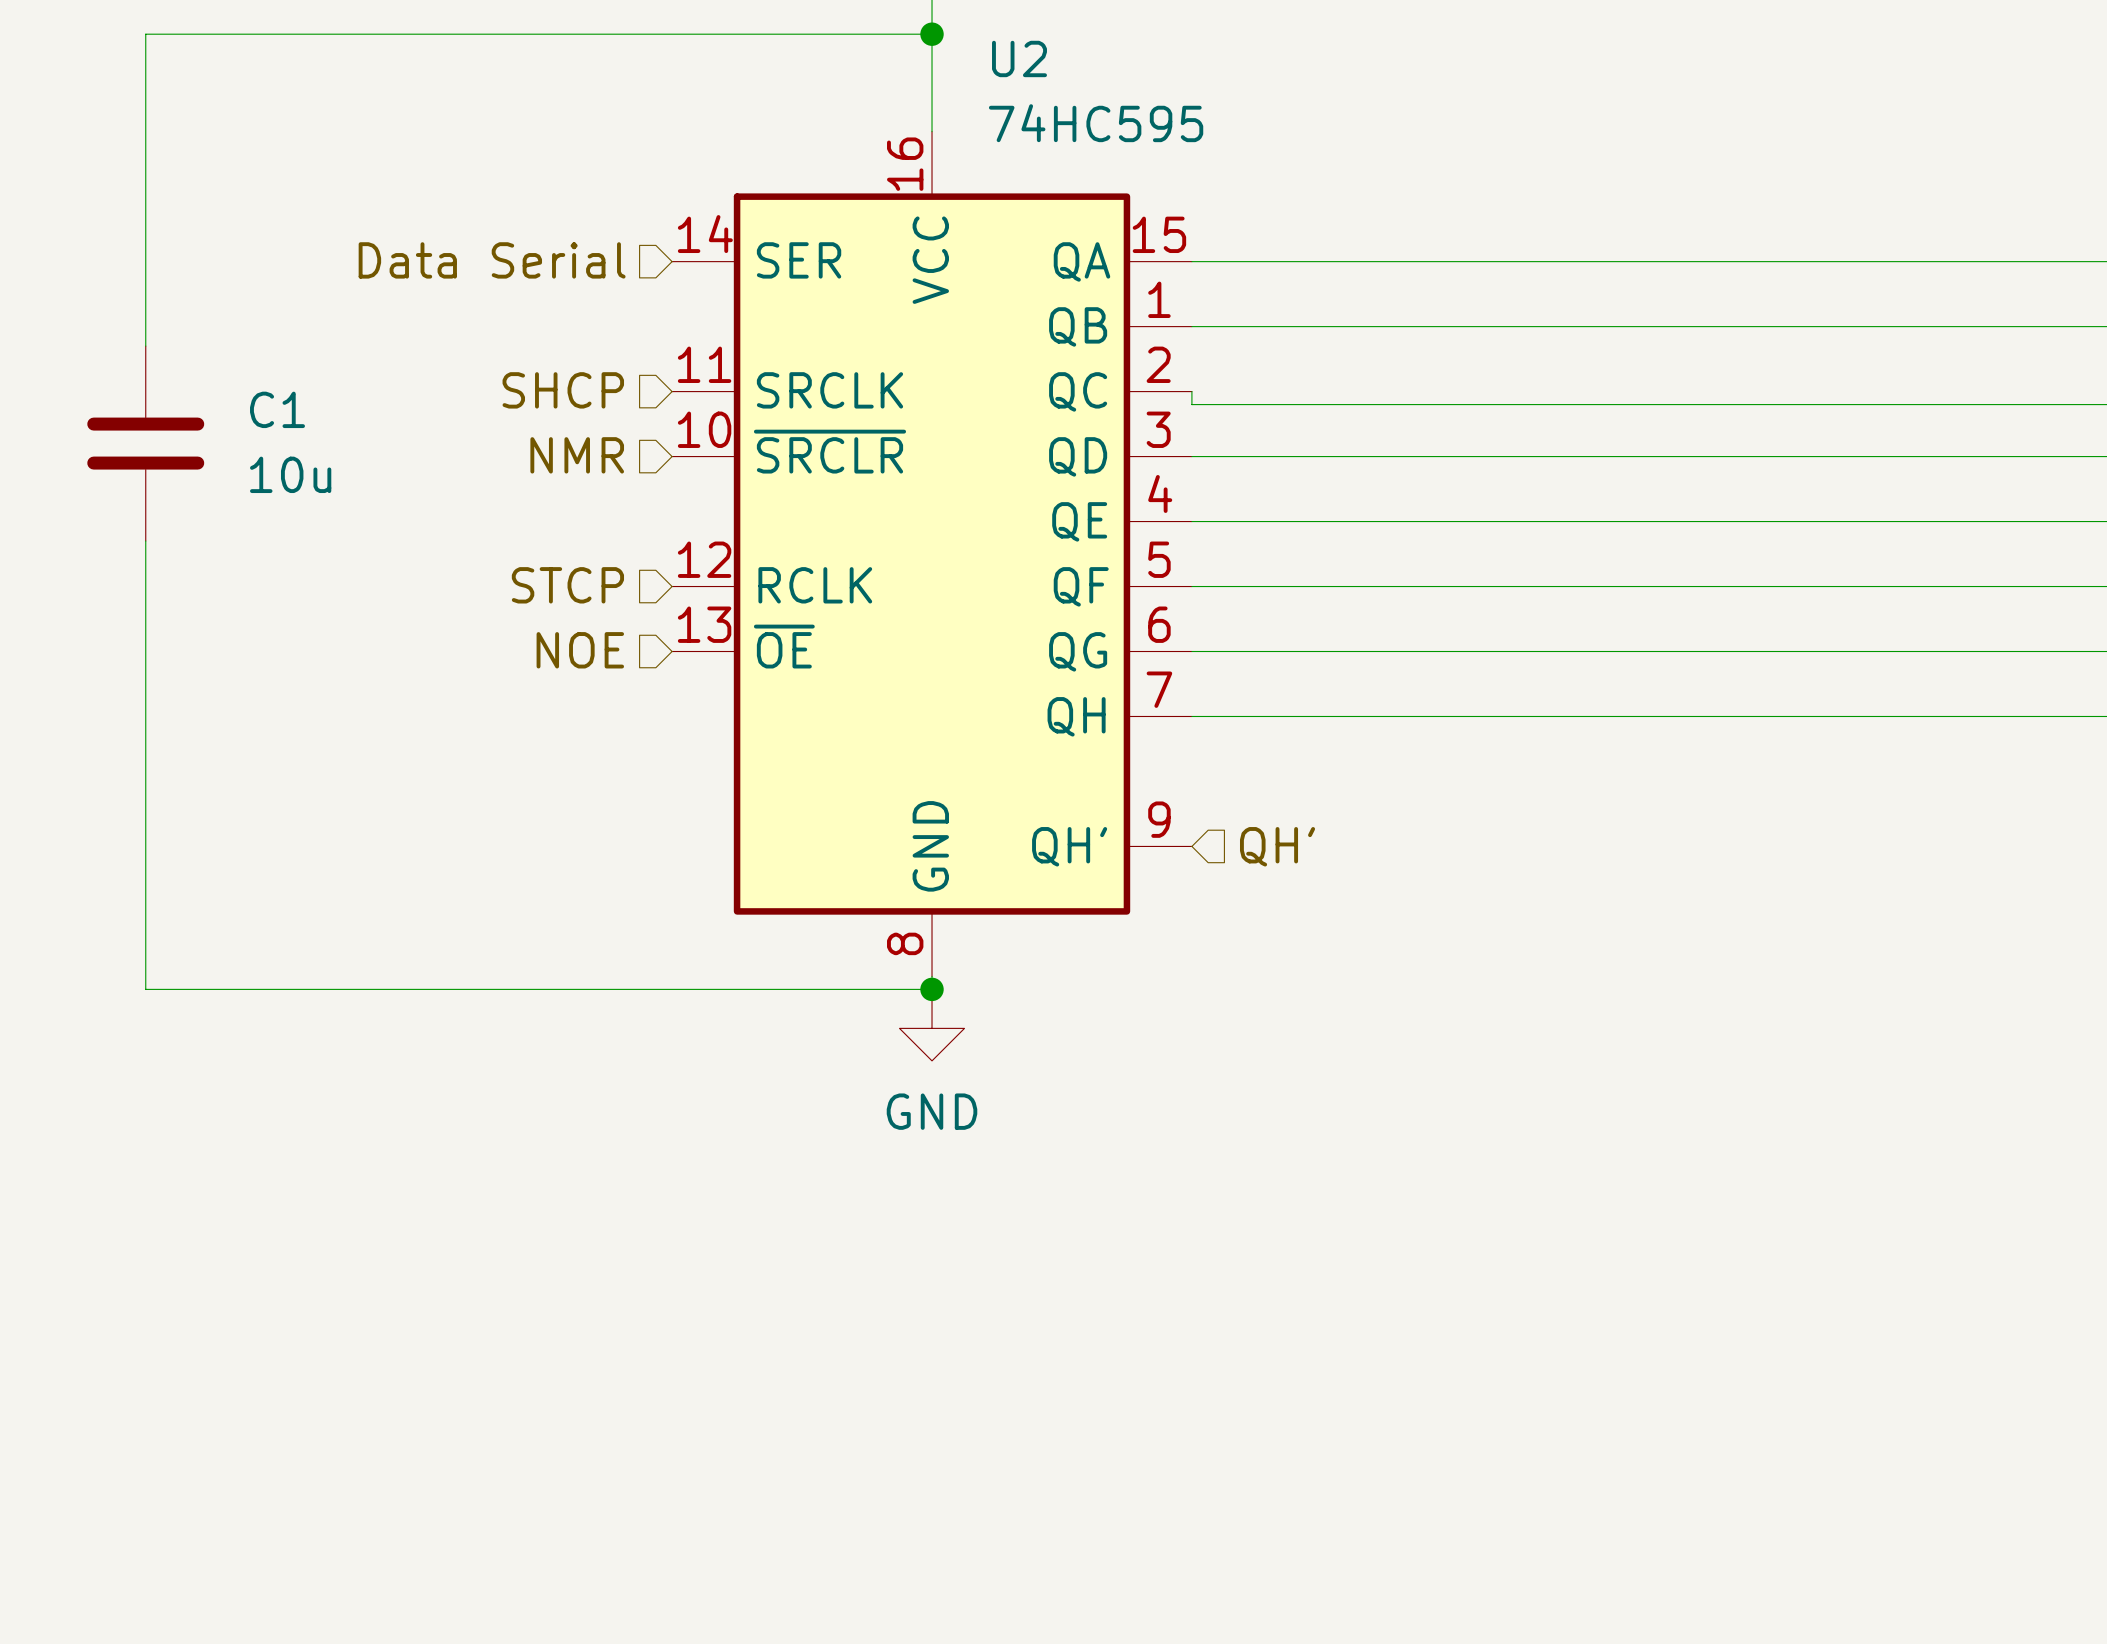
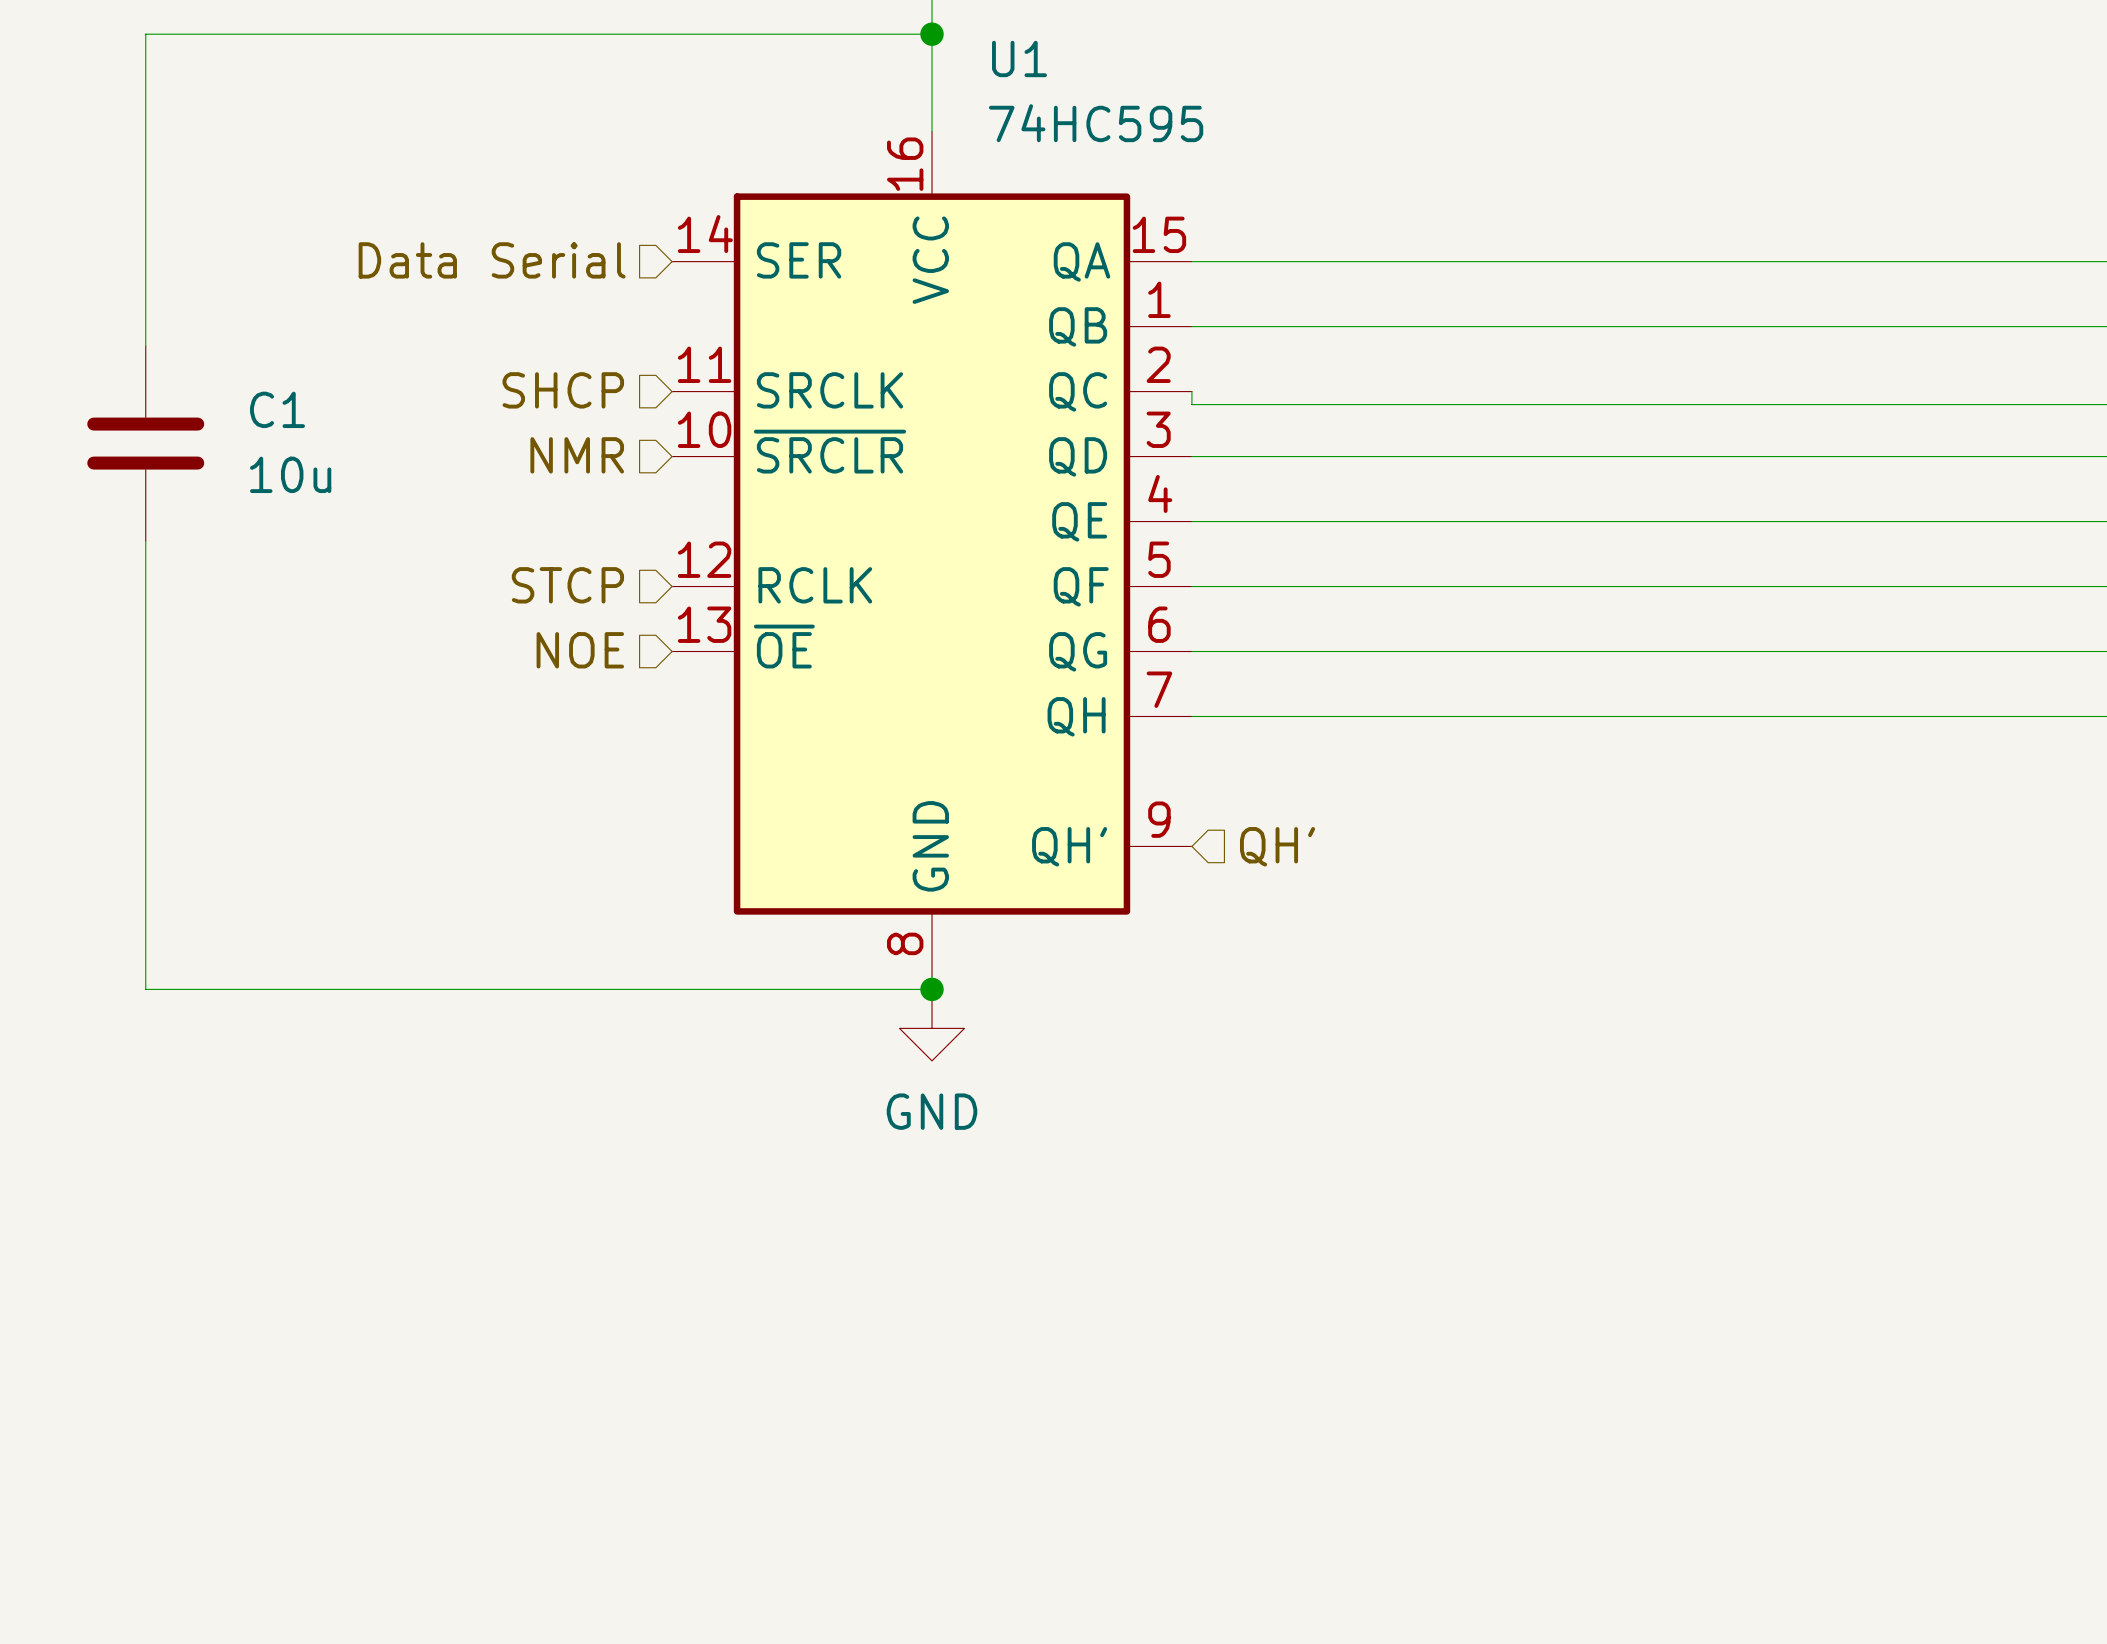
U2 name: U2 (1019, 58) -> U1 (1019, 58)

